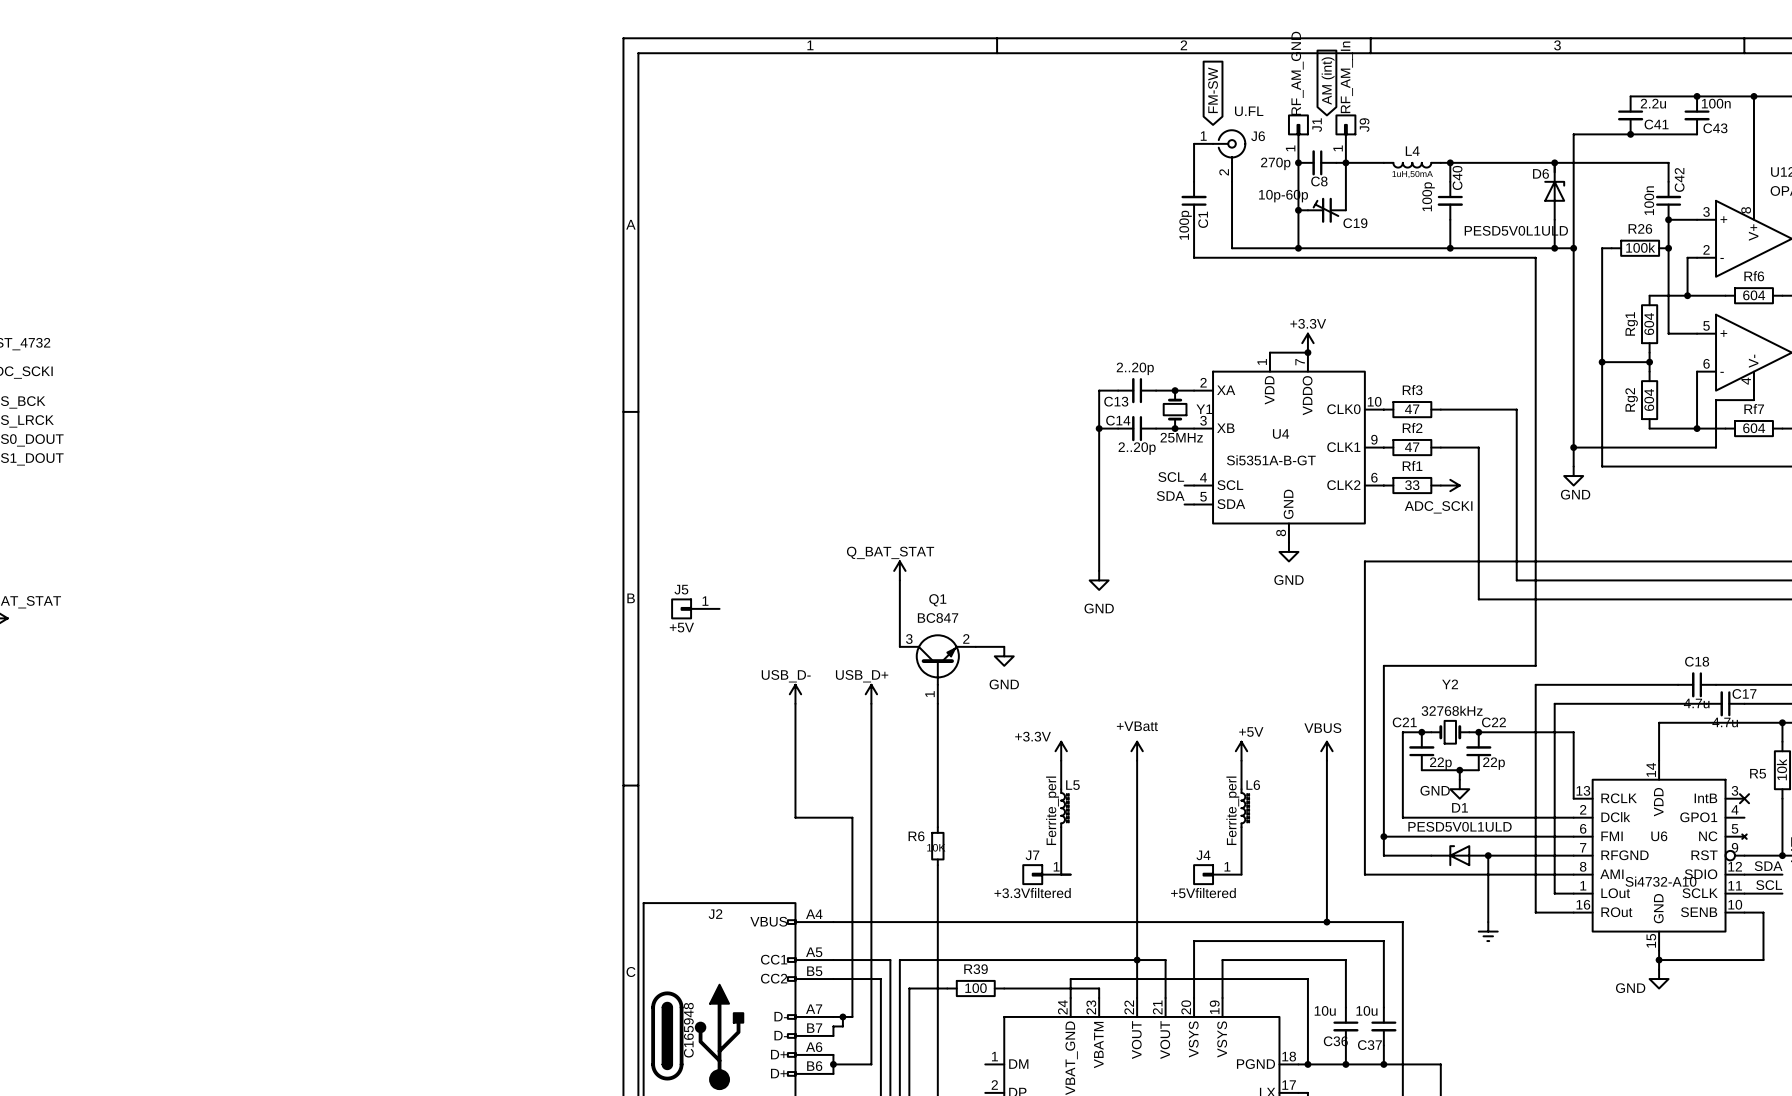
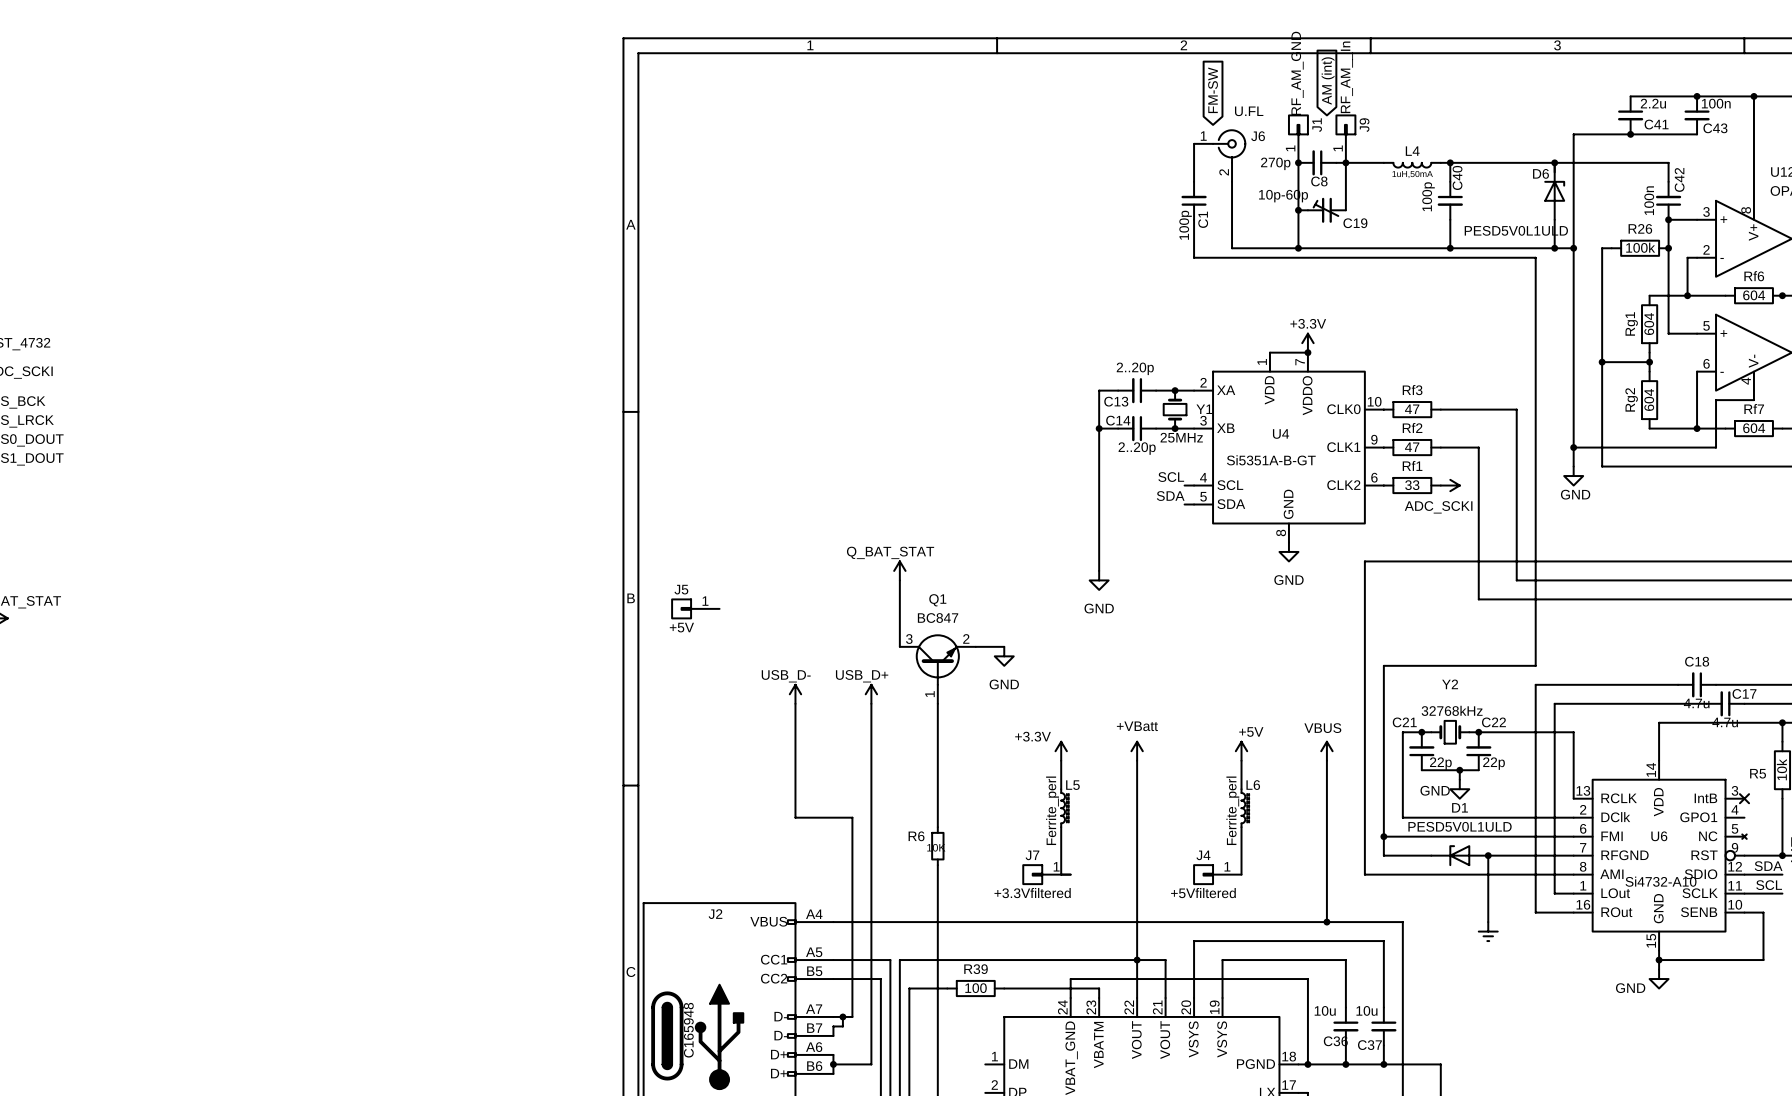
junction: none -> (1782, 295)

